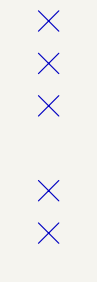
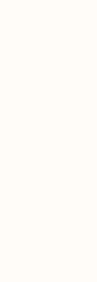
no-connect mark: (48, 21) -> none
no-connect mark: (48, 63) -> none
no-connect mark: (48, 105) -> none
no-connect mark: (48, 190) -> none
no-connect mark: (48, 233) -> none

